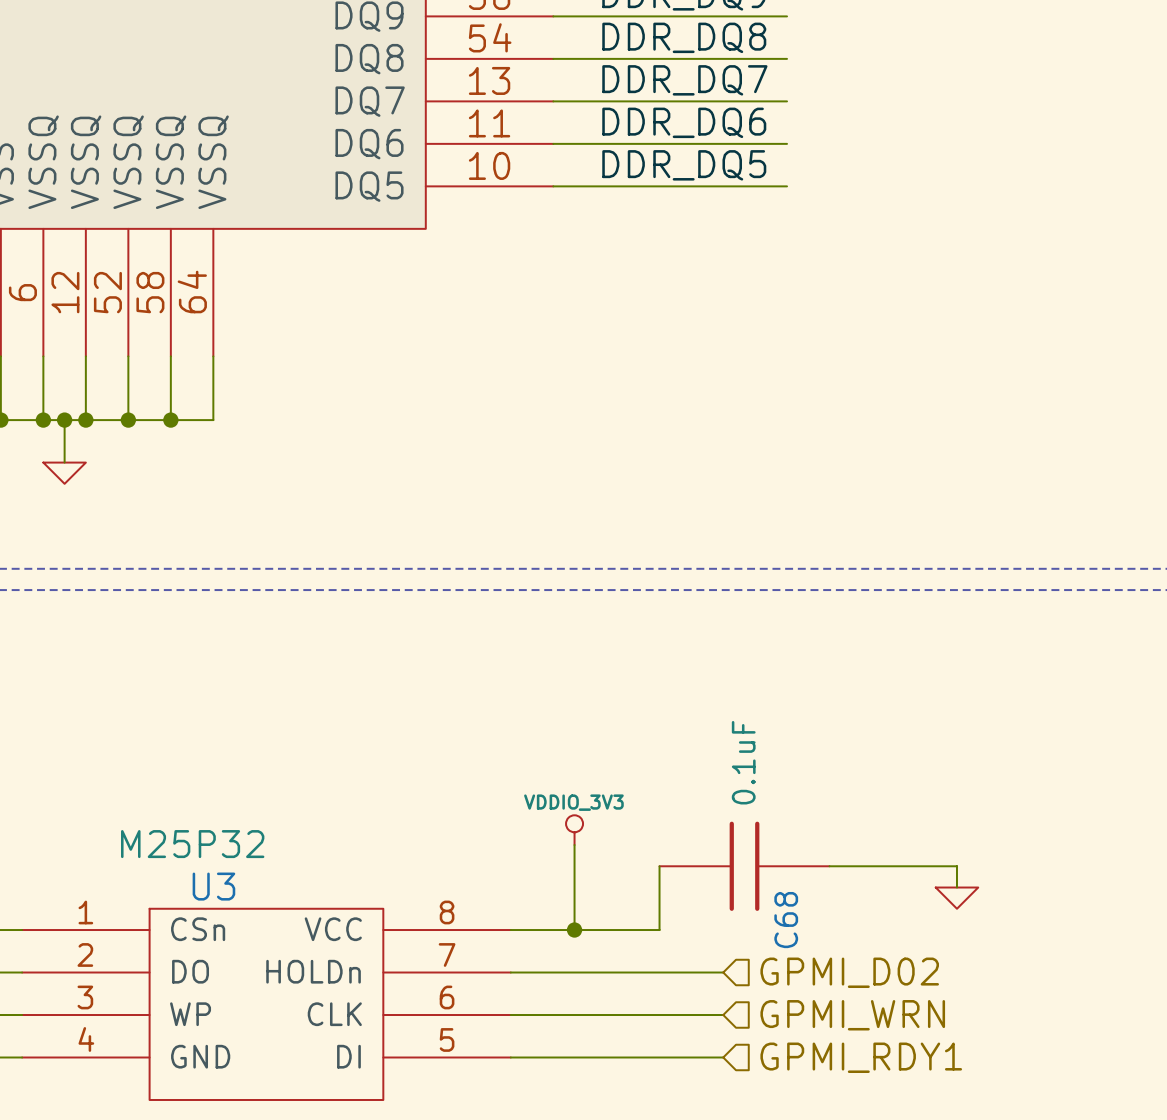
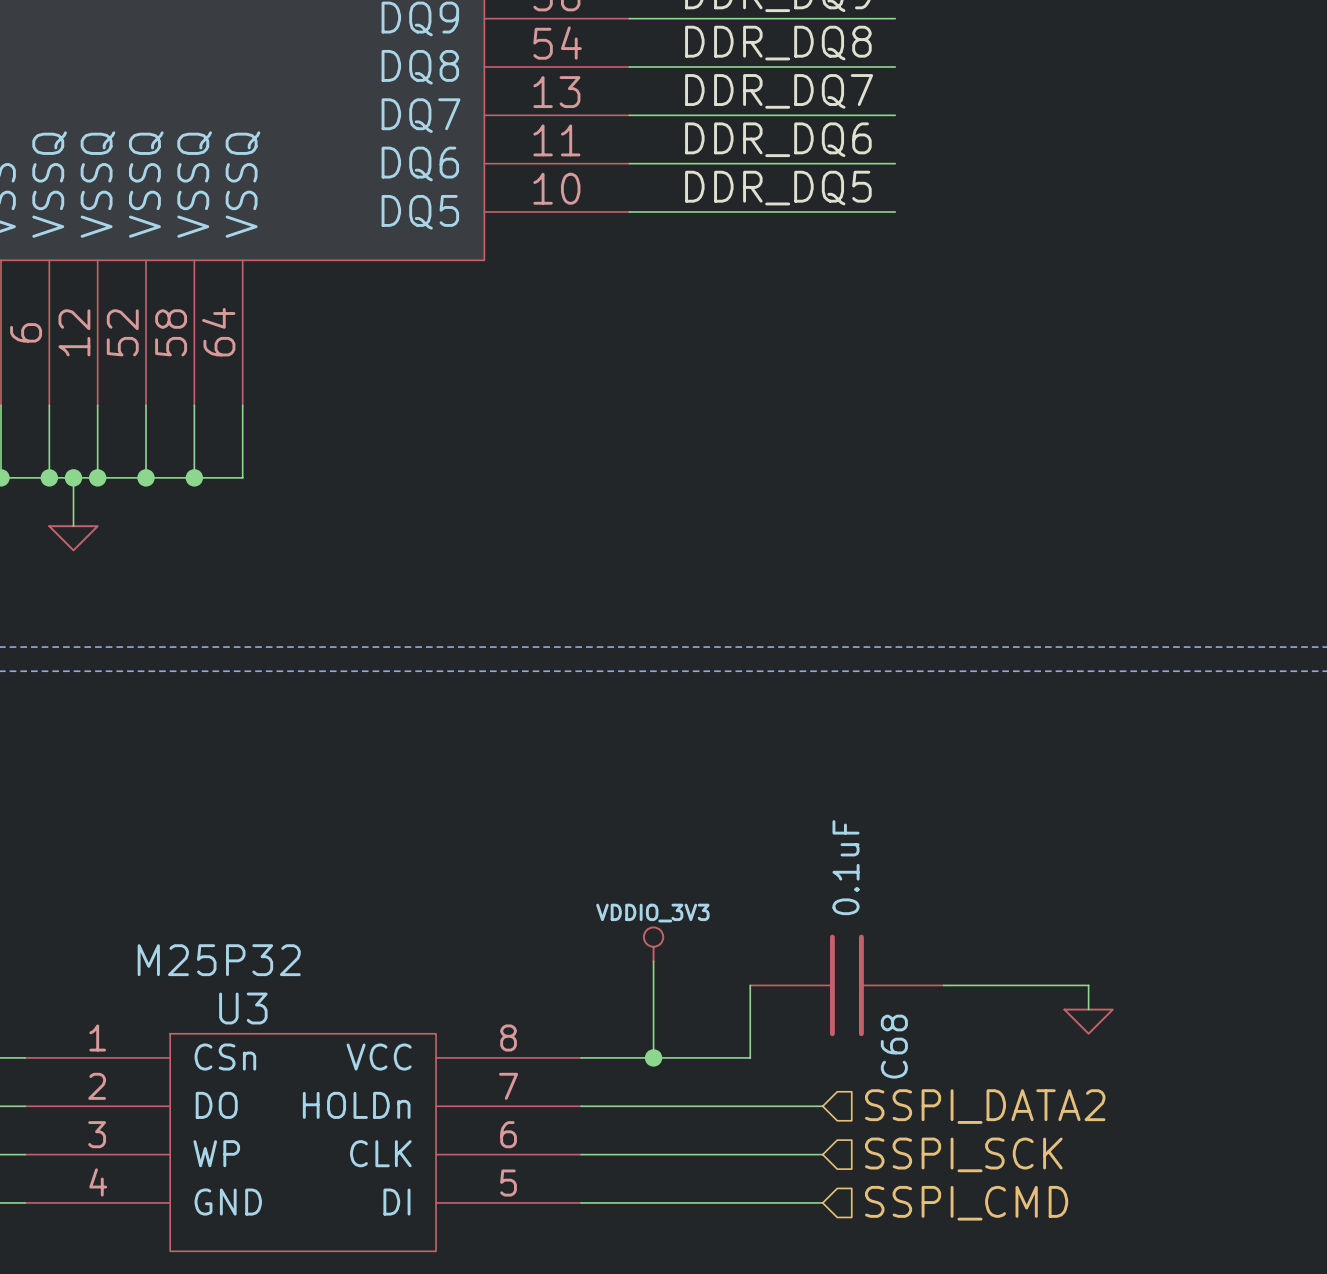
hierarchical label: GPMI_D02 (849, 972) -> SSPI_DATA2 (985, 1106)
hierarchical label: GPMI_WRN (852, 1015) -> SSPI_SCK (963, 1154)
hierarchical label: GPMI_RDY1 (861, 1057) -> SSPI_CMD (966, 1203)

